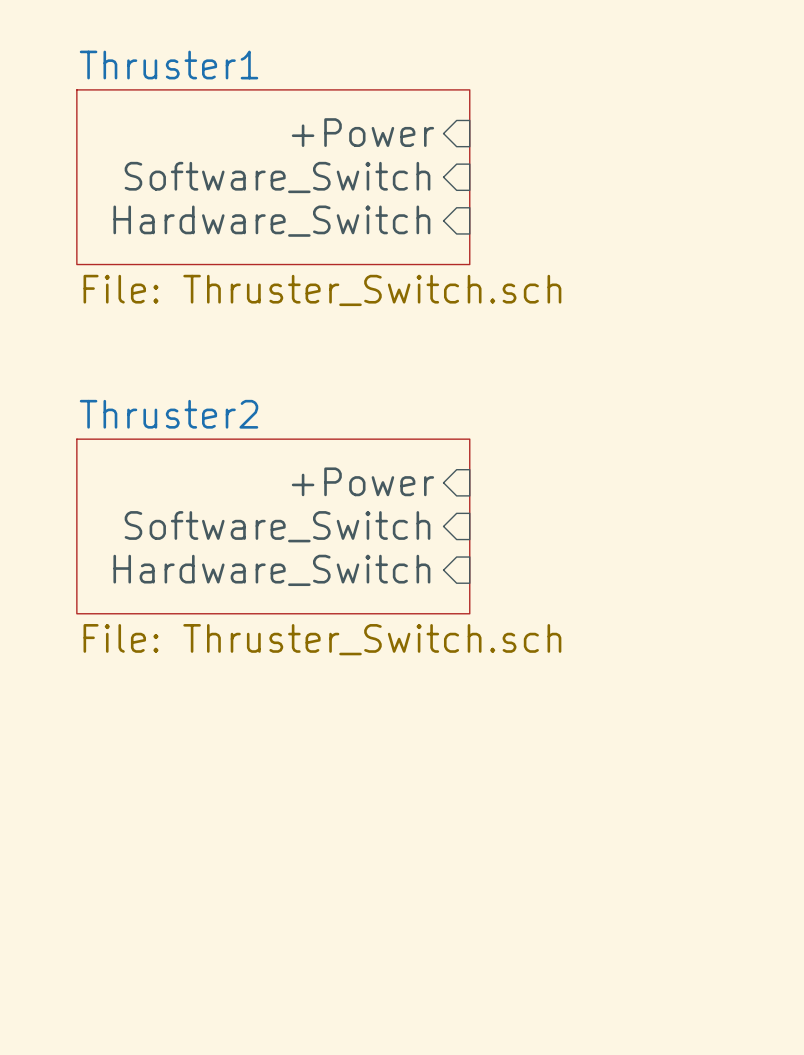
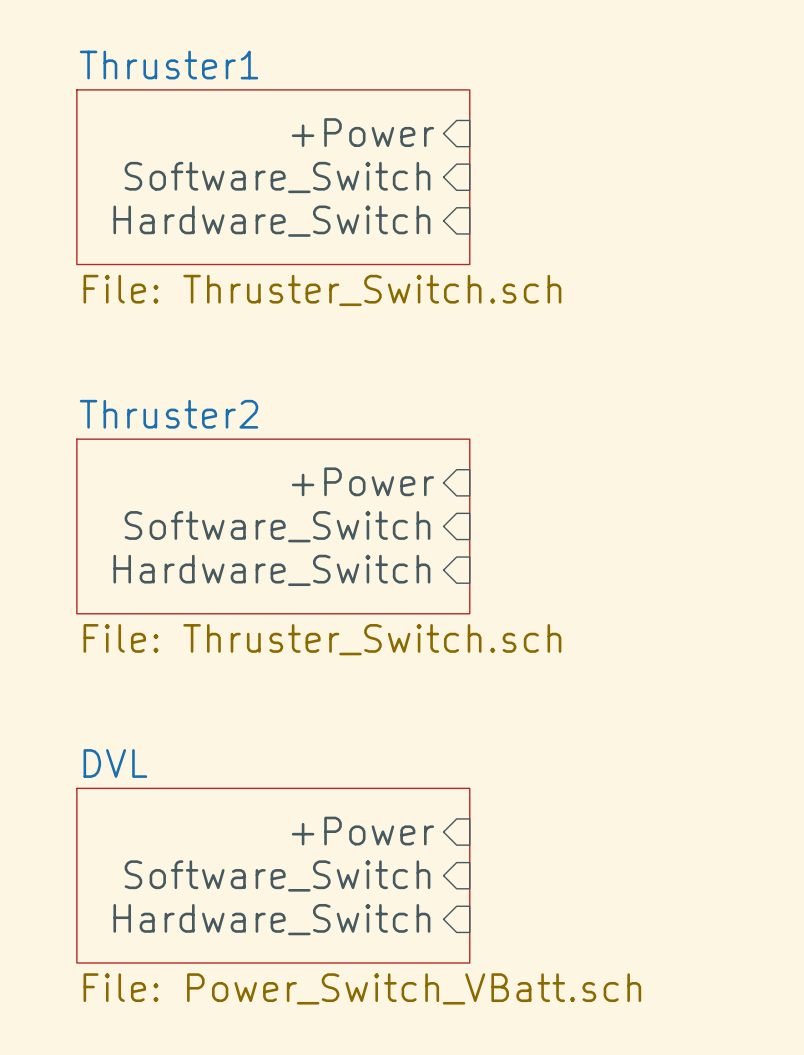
sheet pin: none -> +Power (362, 831)
sheet DVL: none -> File: Power_Switch_VBatt.sch (273, 875)
sheet pin: none -> Software_Switch (277, 875)
sheet pin: none -> Hardware_Switch (271, 919)

